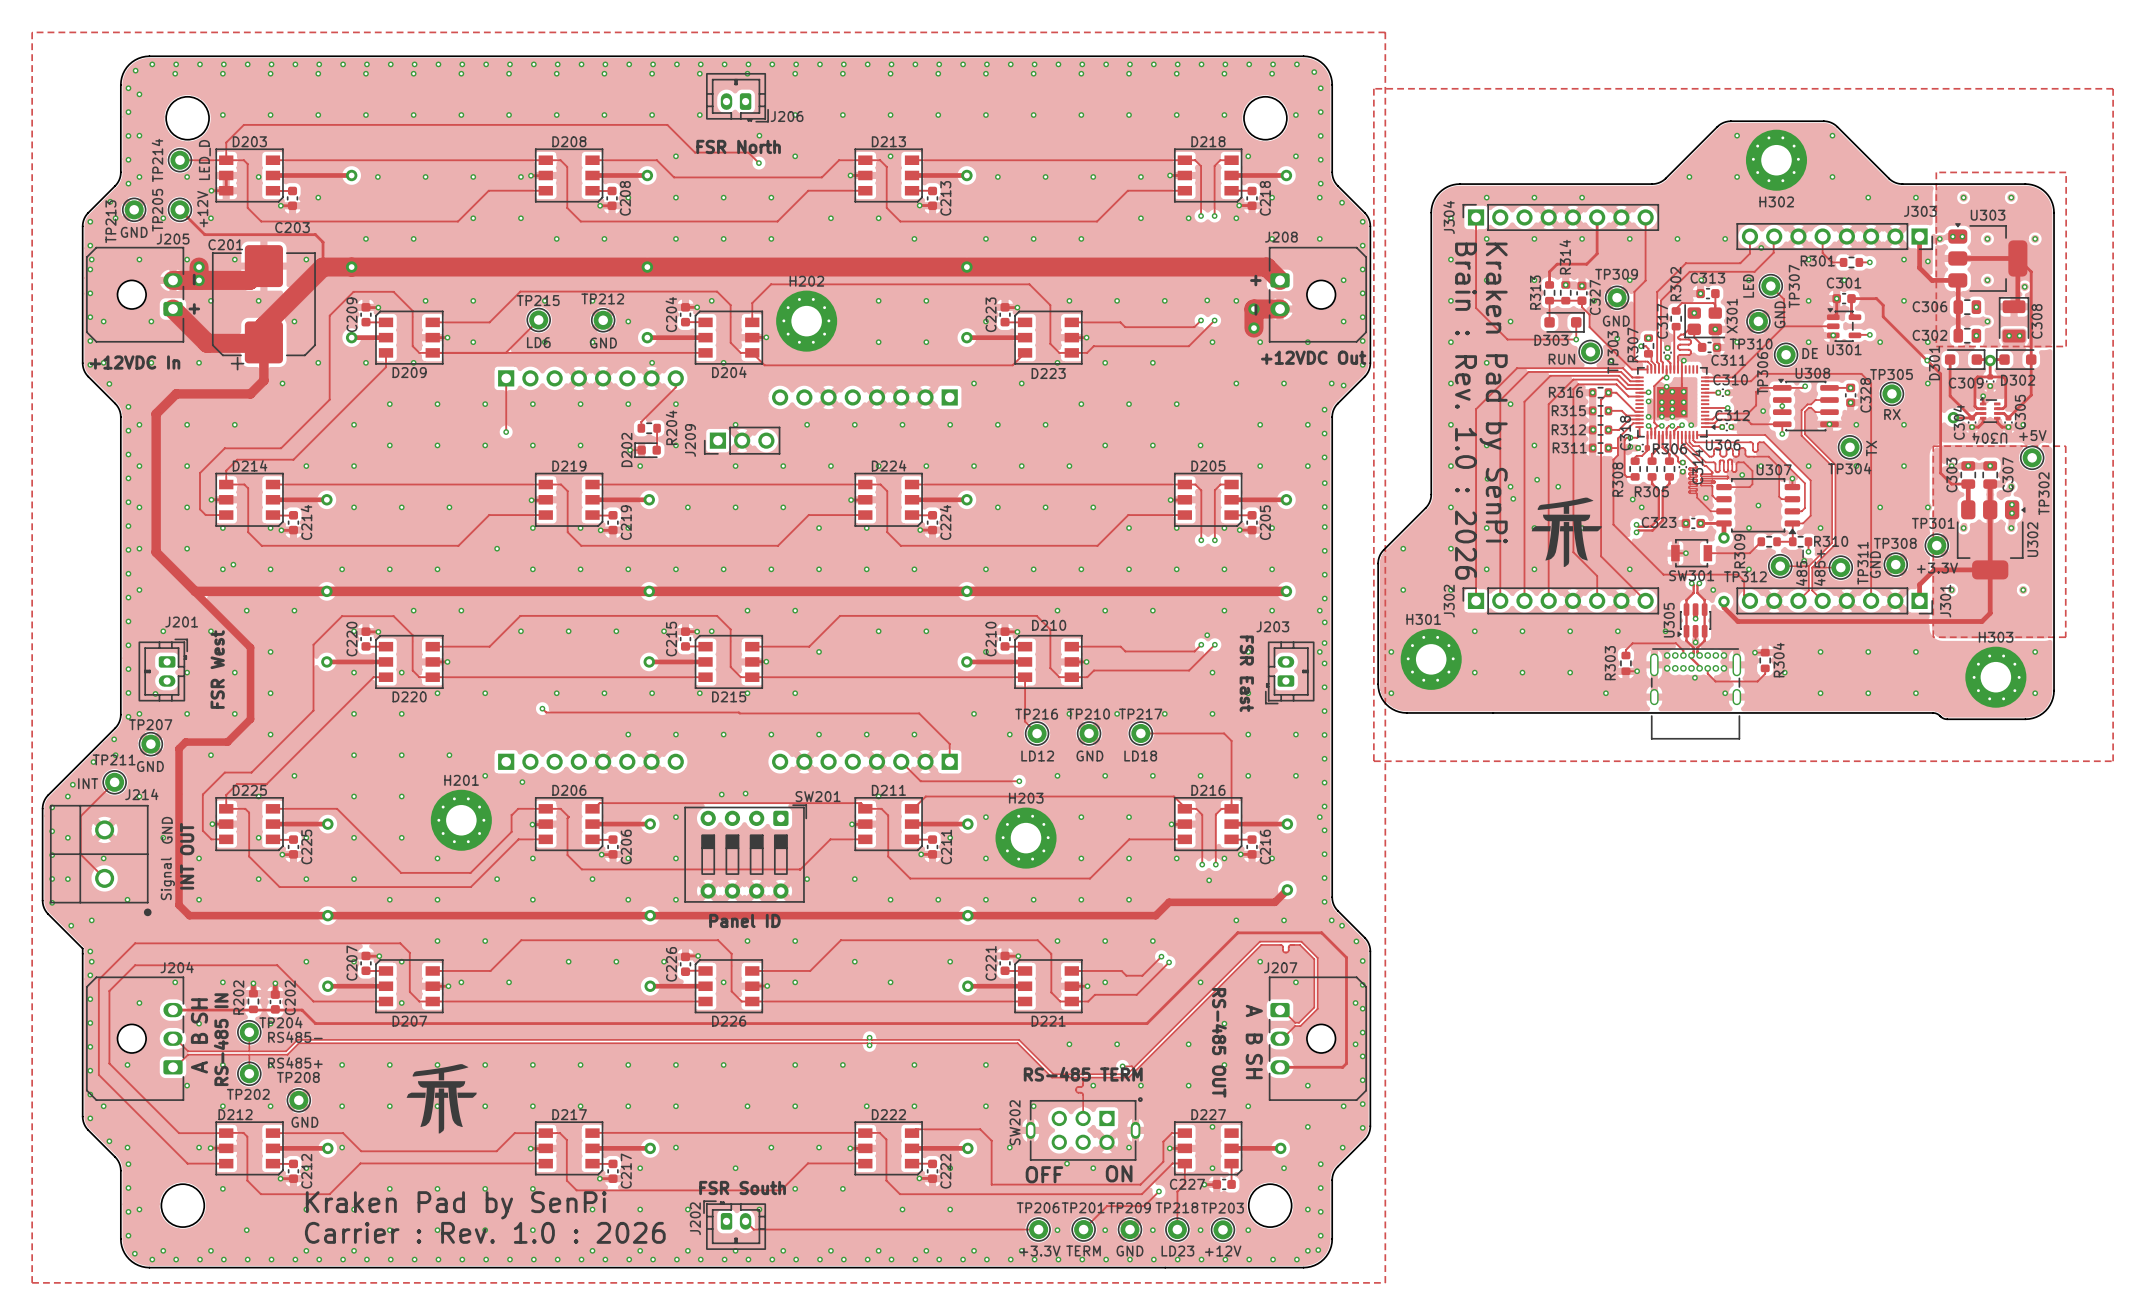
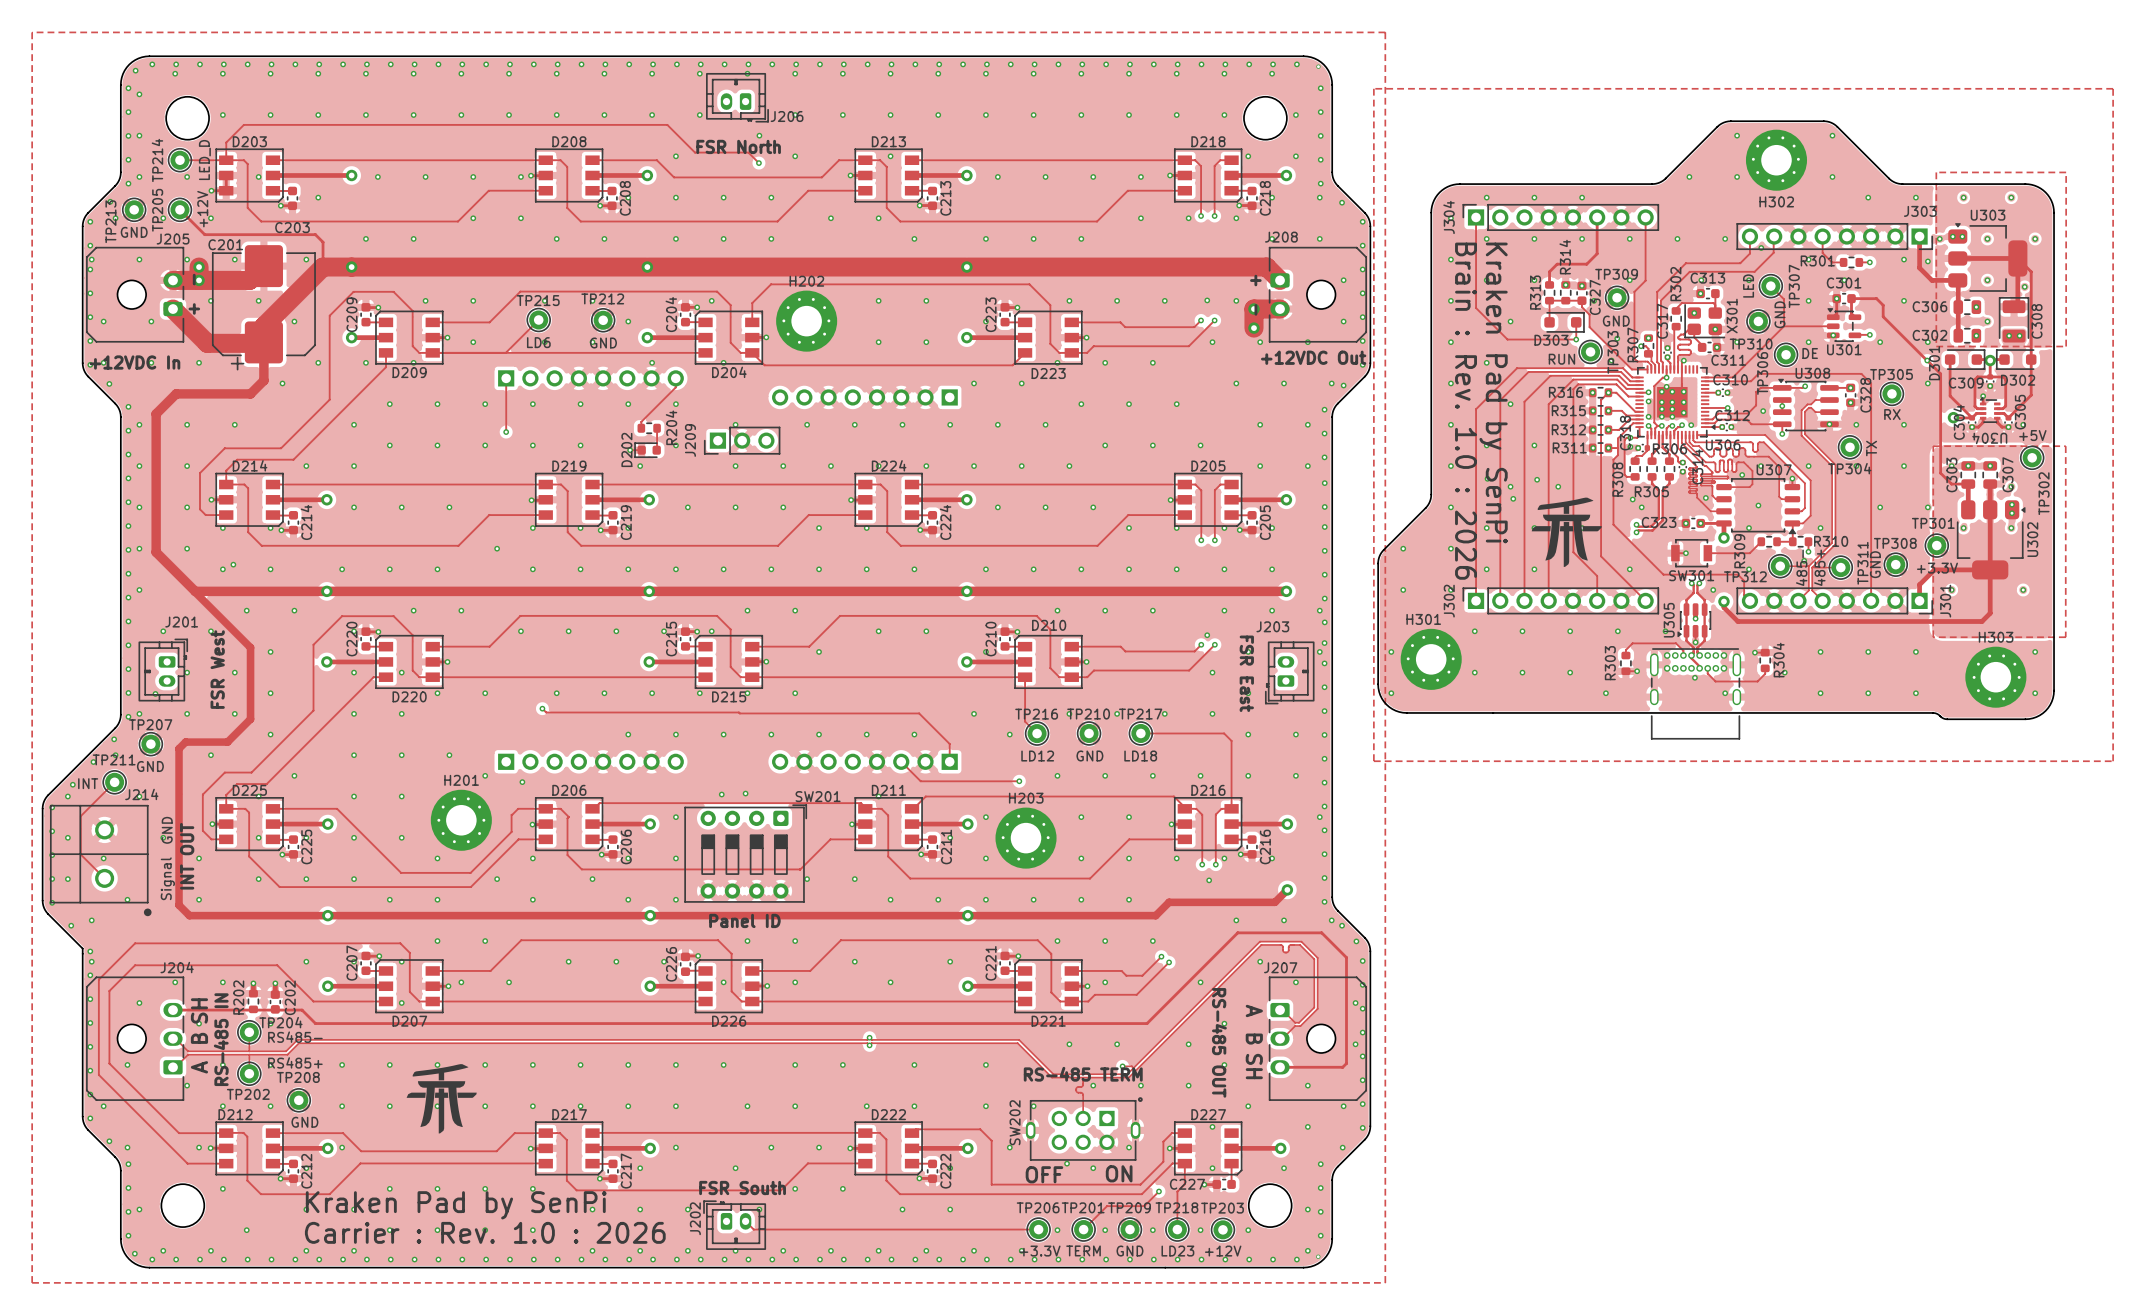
via: none -> (1318, 66)
via: (1314, 72) -> none
via: (1318, 1250) -> none
via: none -> (1318, 1256)

